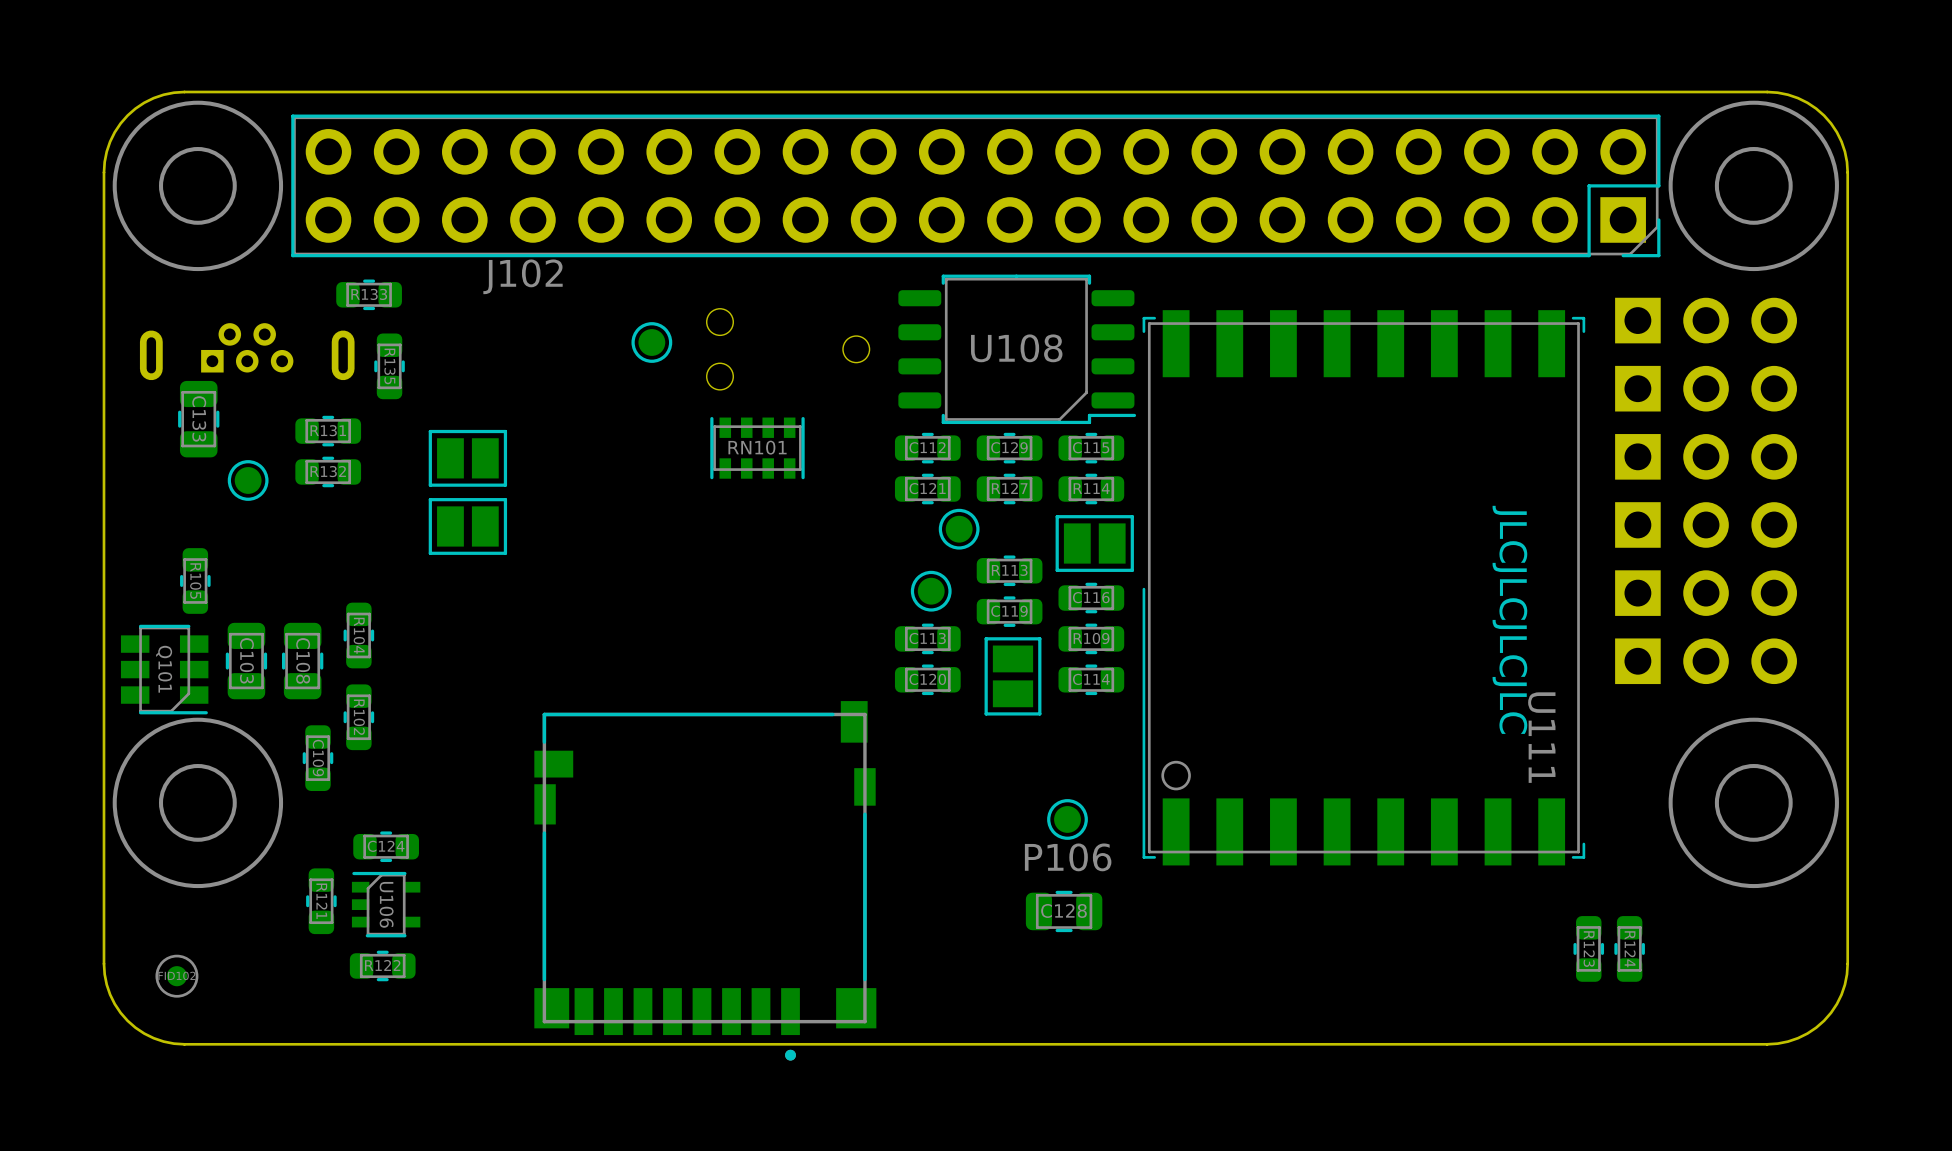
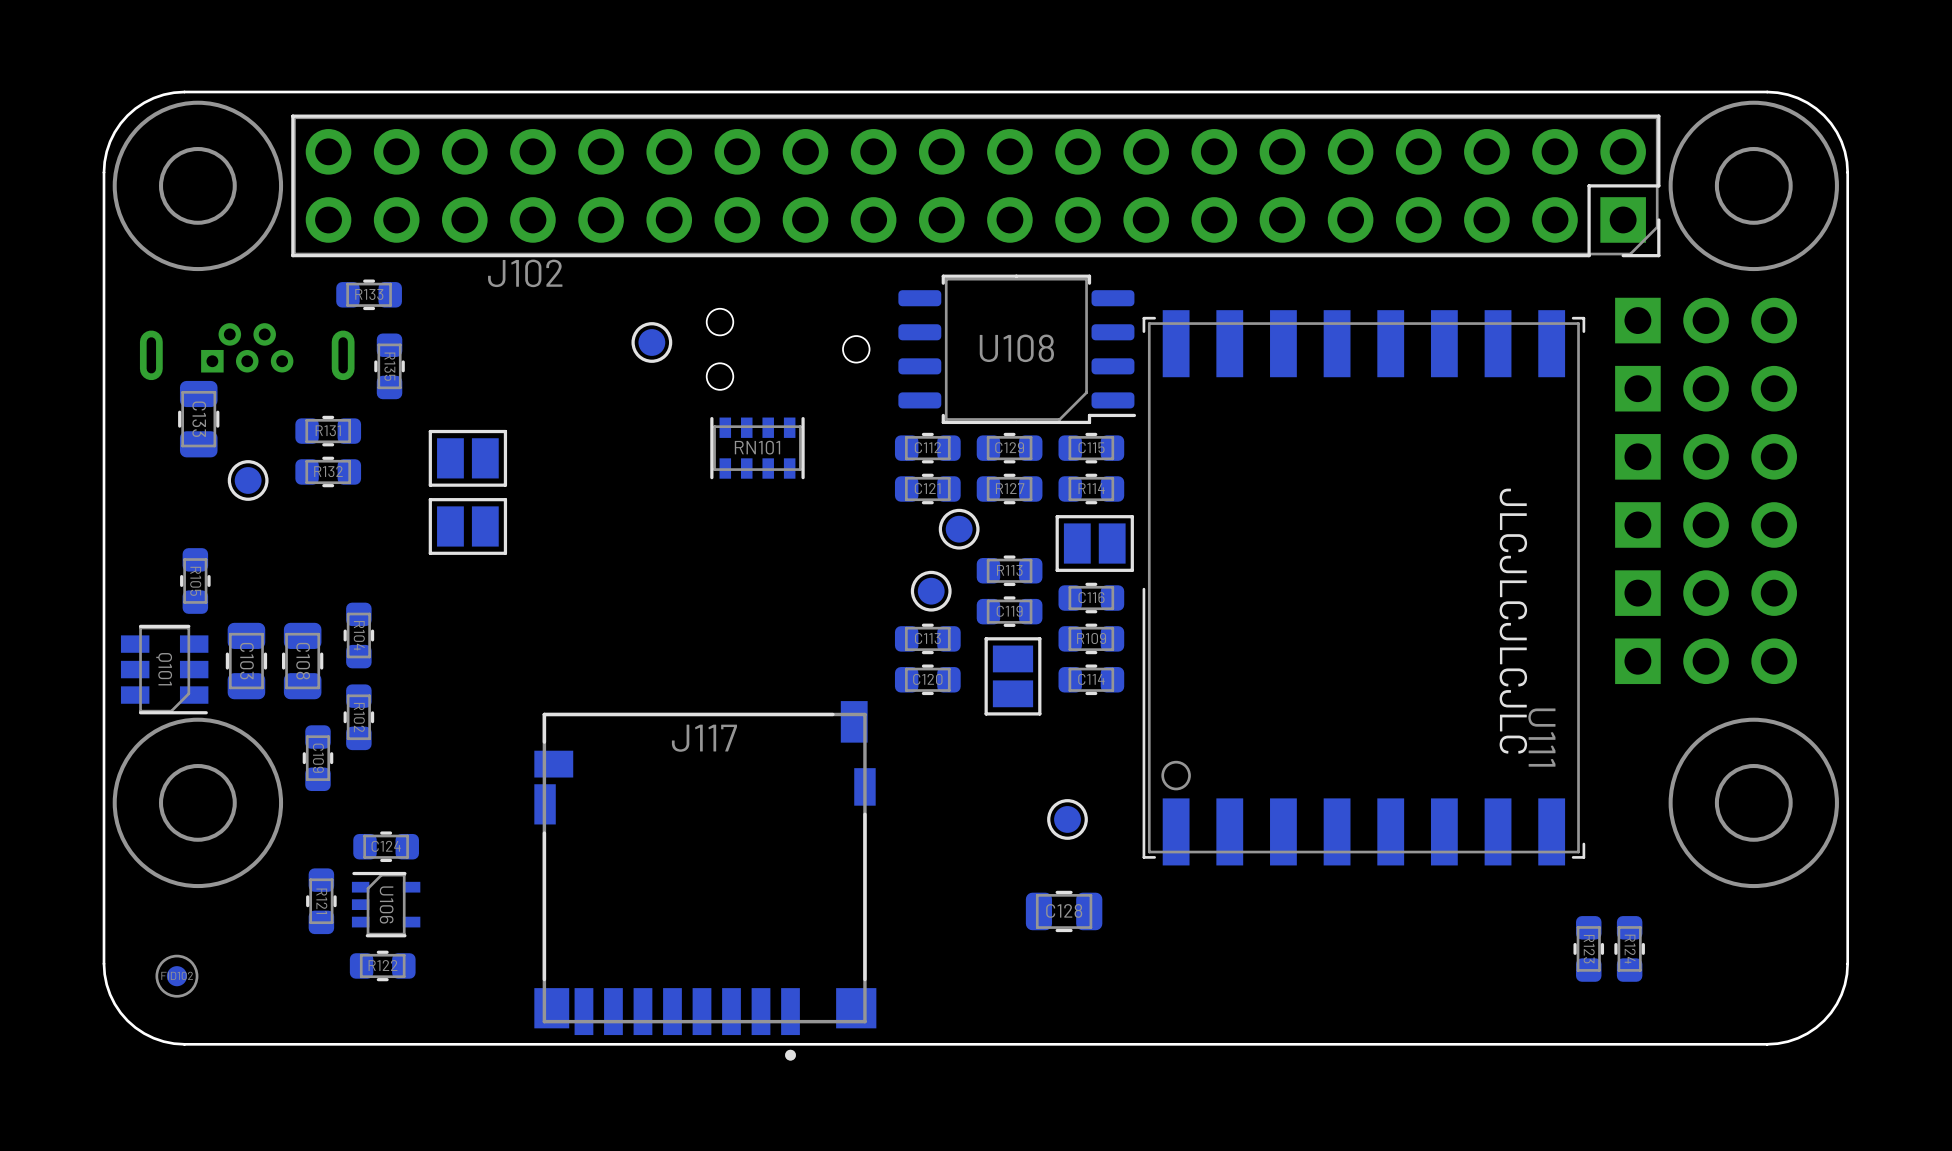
text: none -> J117 (704, 738)
P106 name: P106 (1068, 857) -> none

